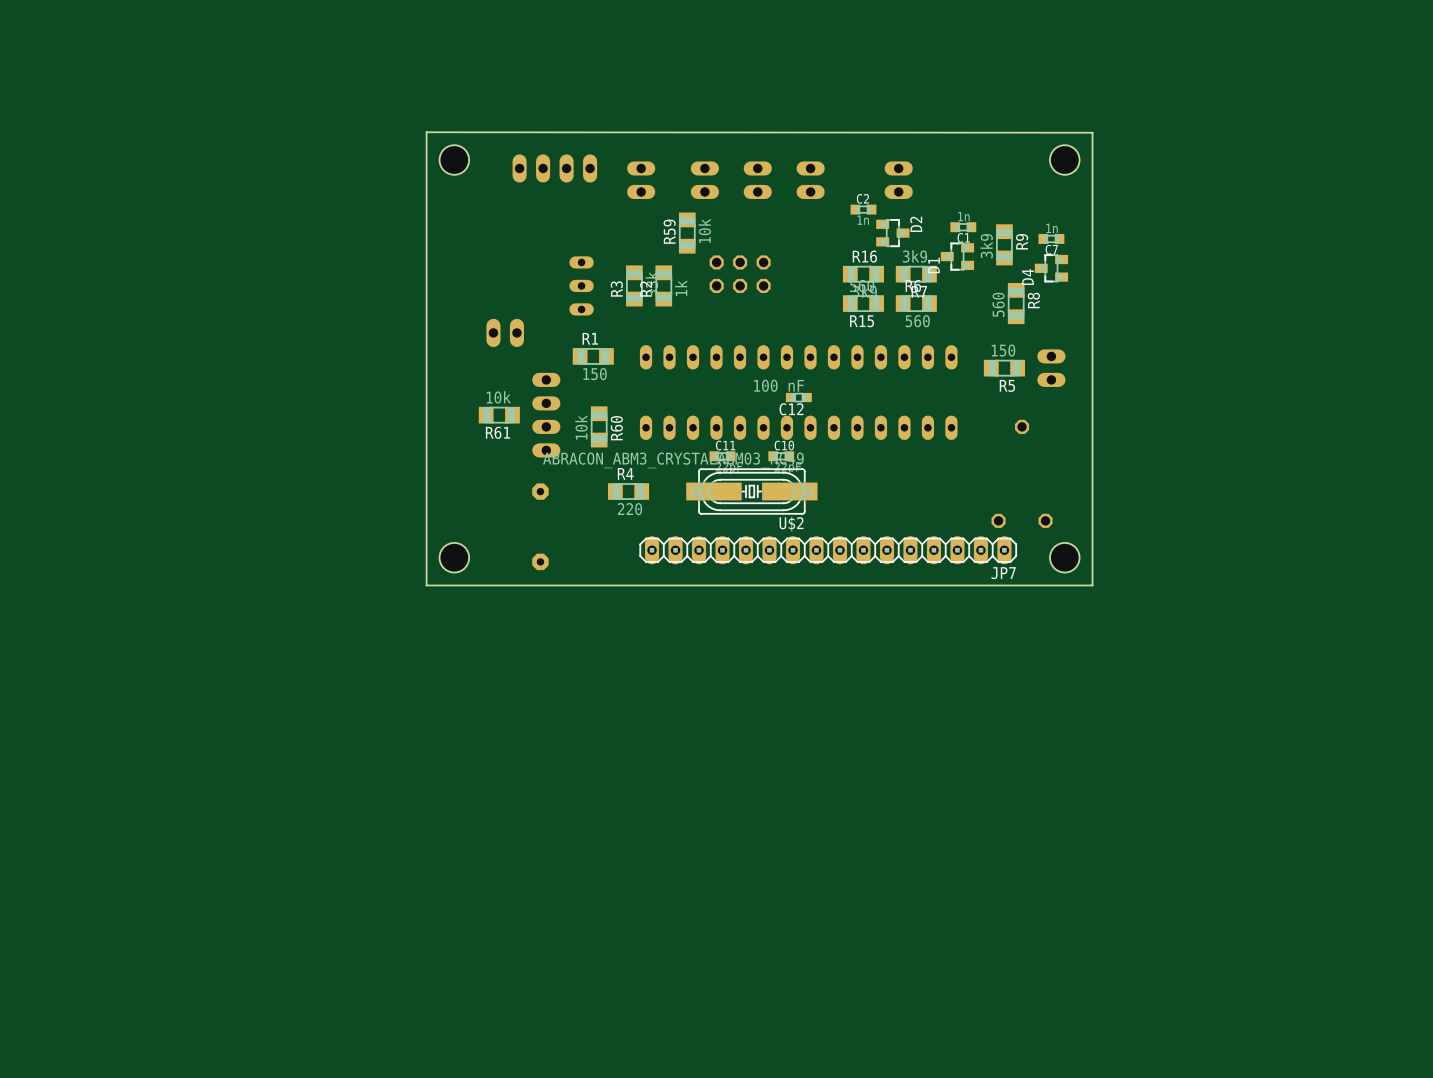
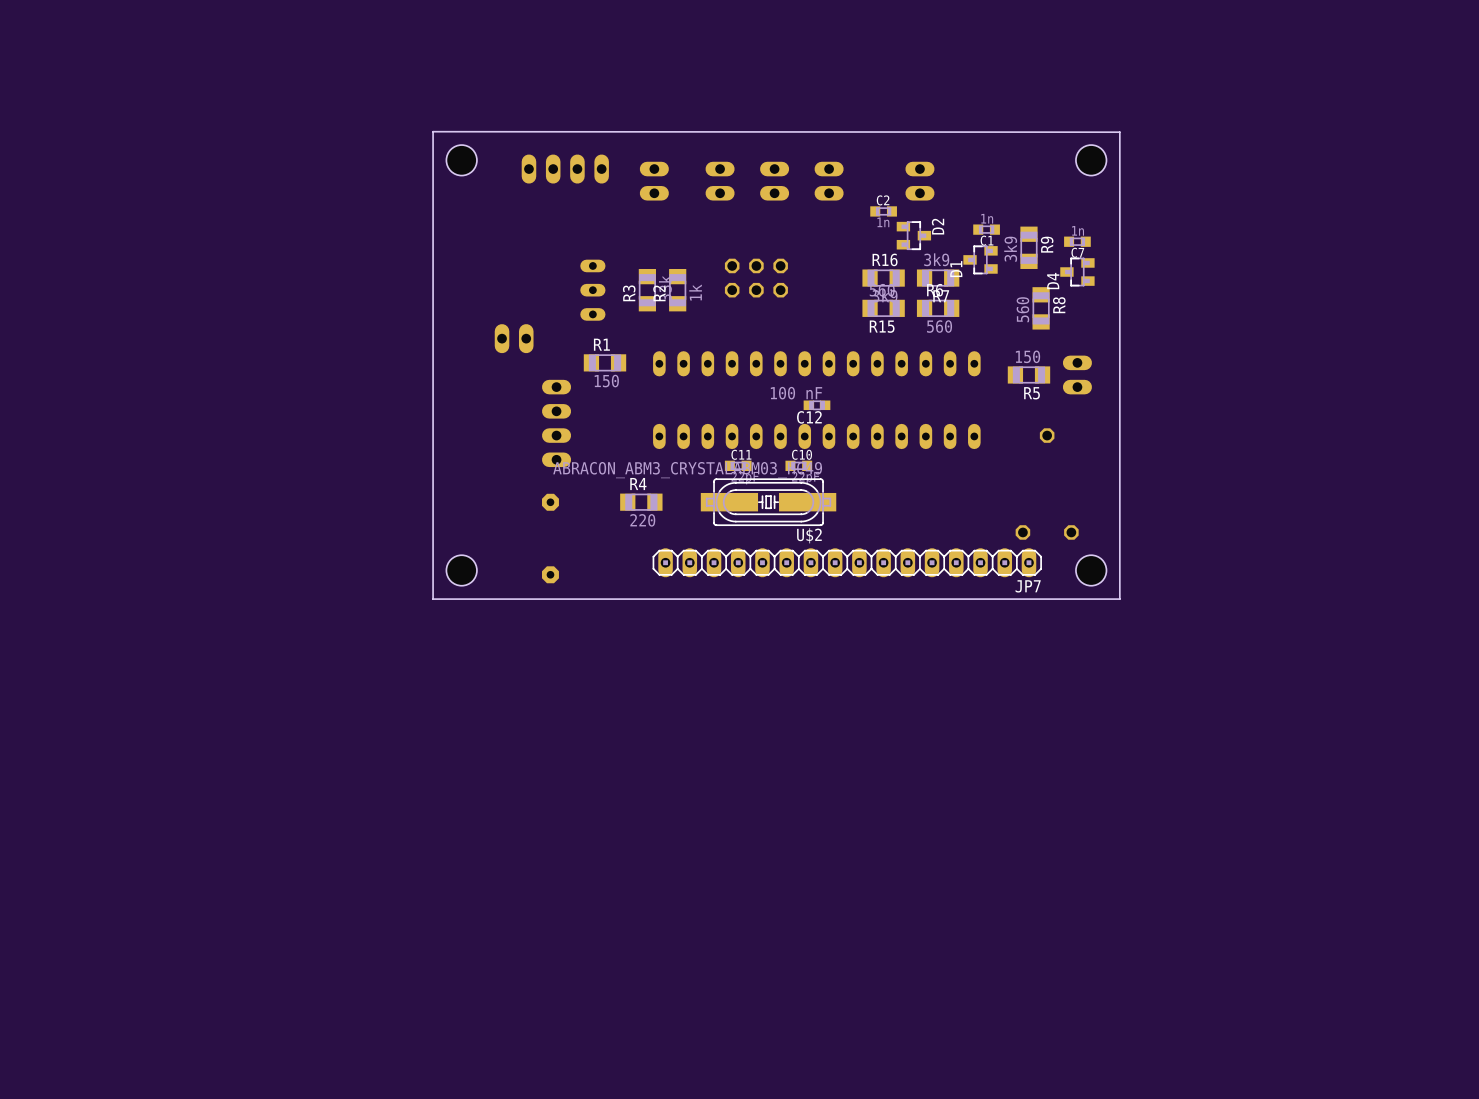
R59: 10k (687, 233) -> none
R61: 10k (499, 415) -> none
R60: 10k (599, 426) -> none

